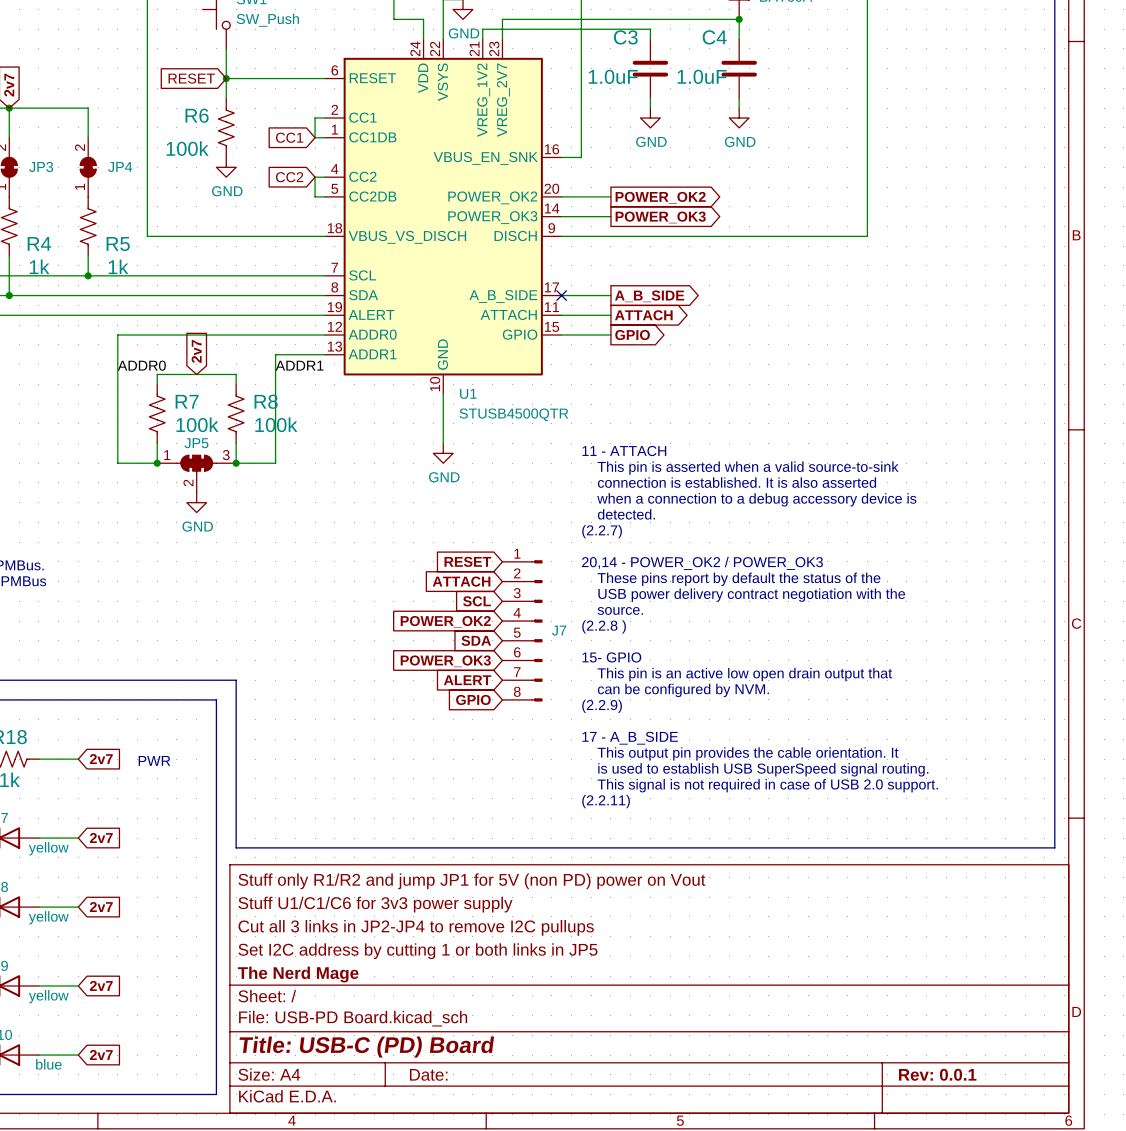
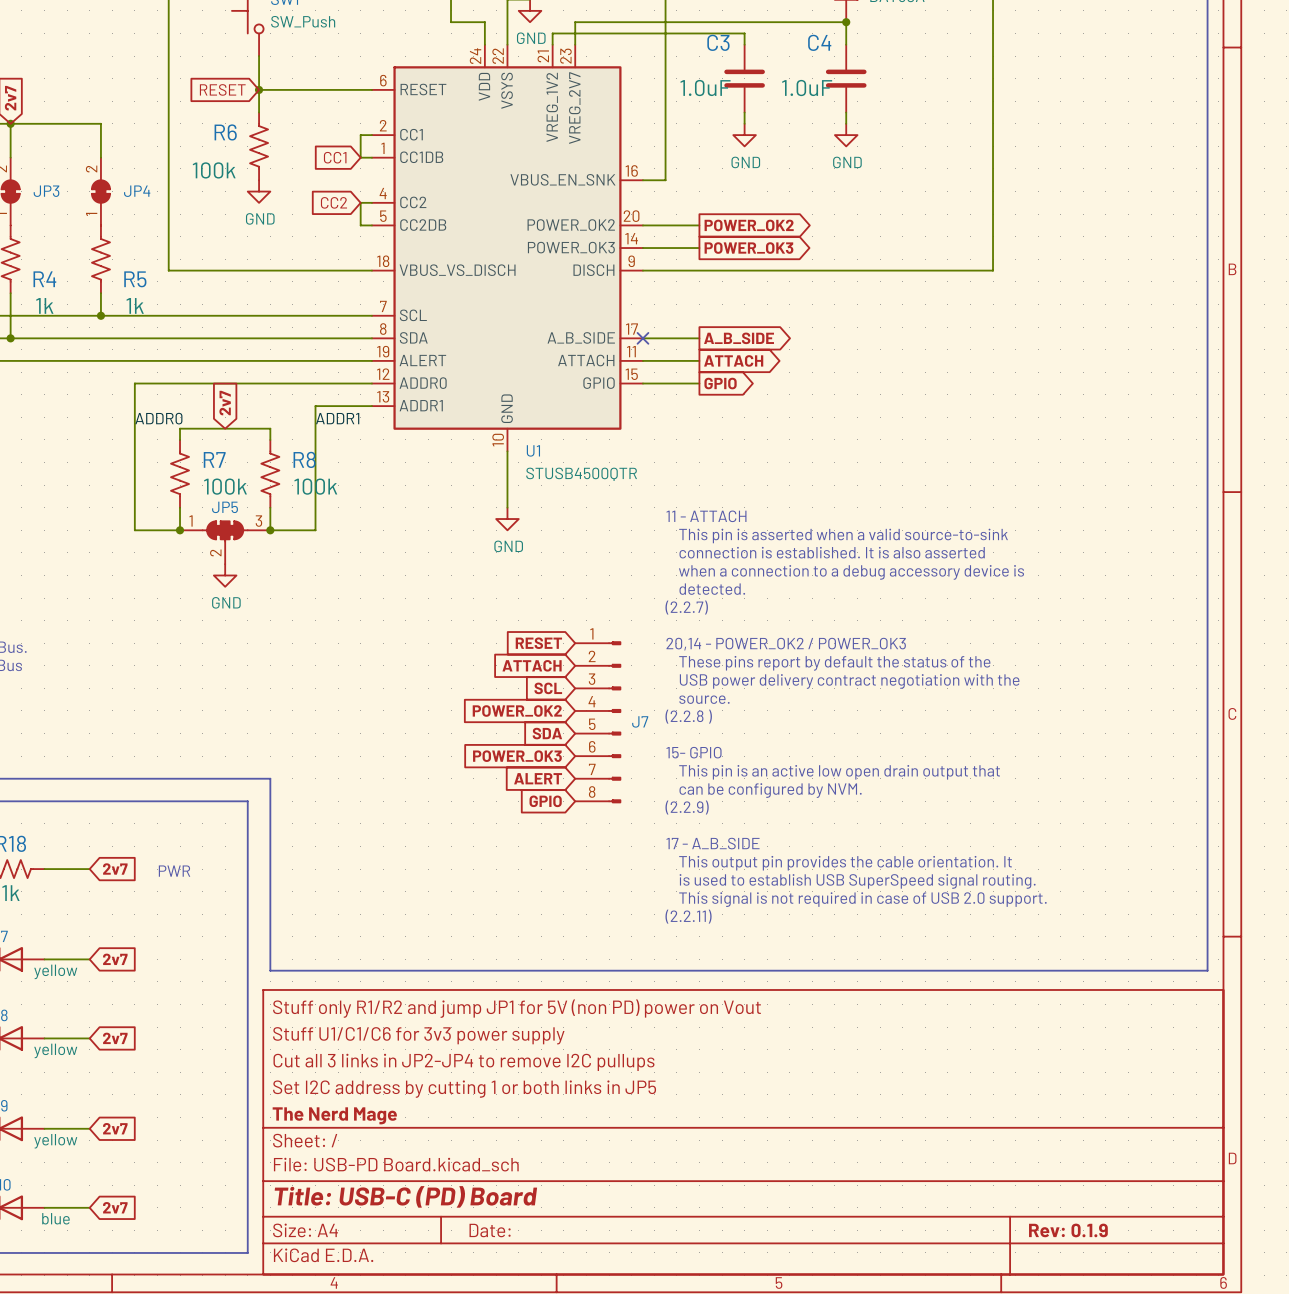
title block: Rev: 0.0.1 (937, 1074) -> Rev: 0.1.9 (1068, 1230)

